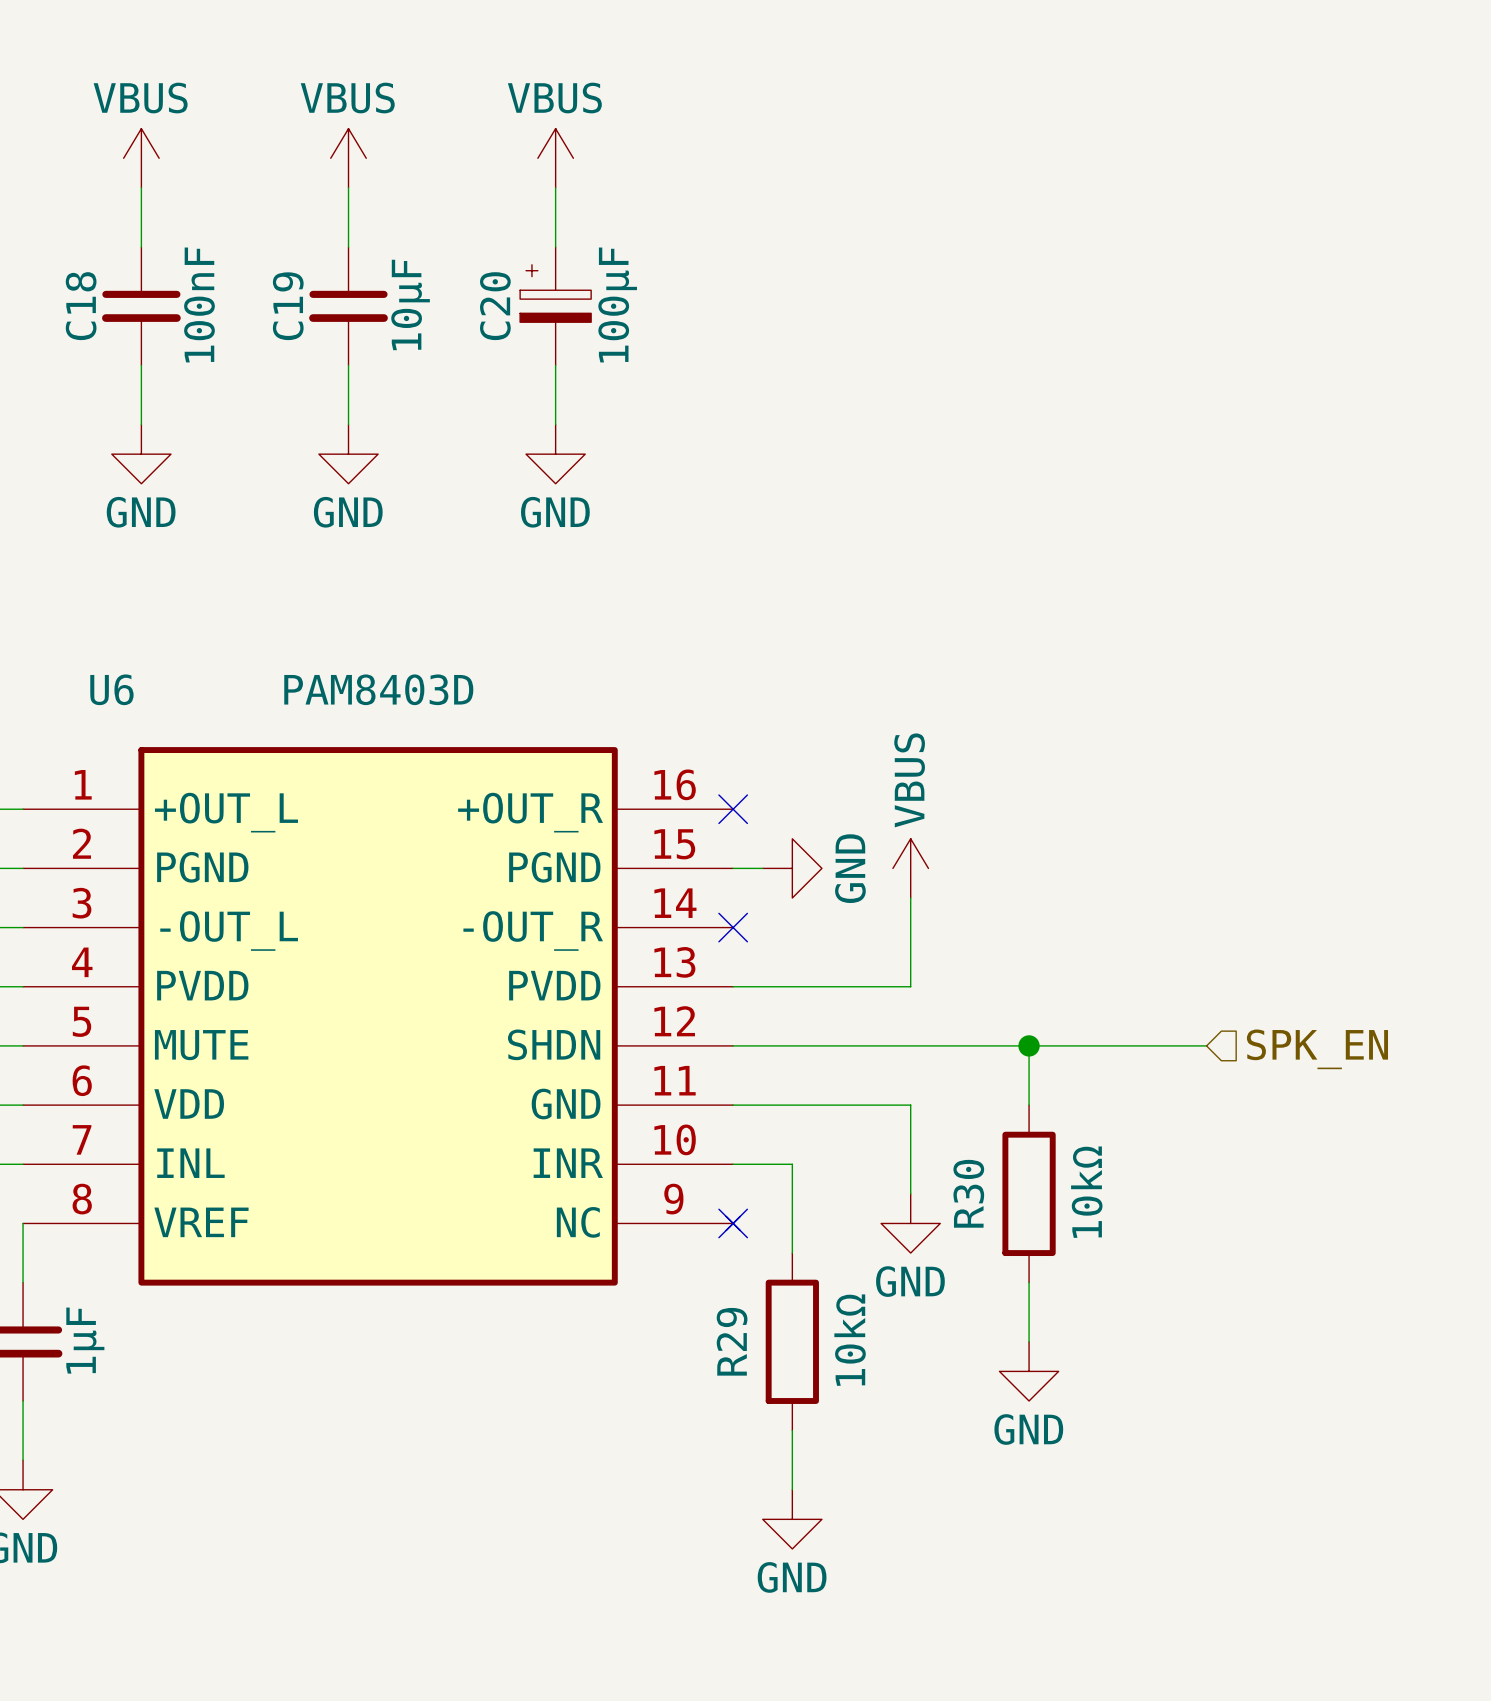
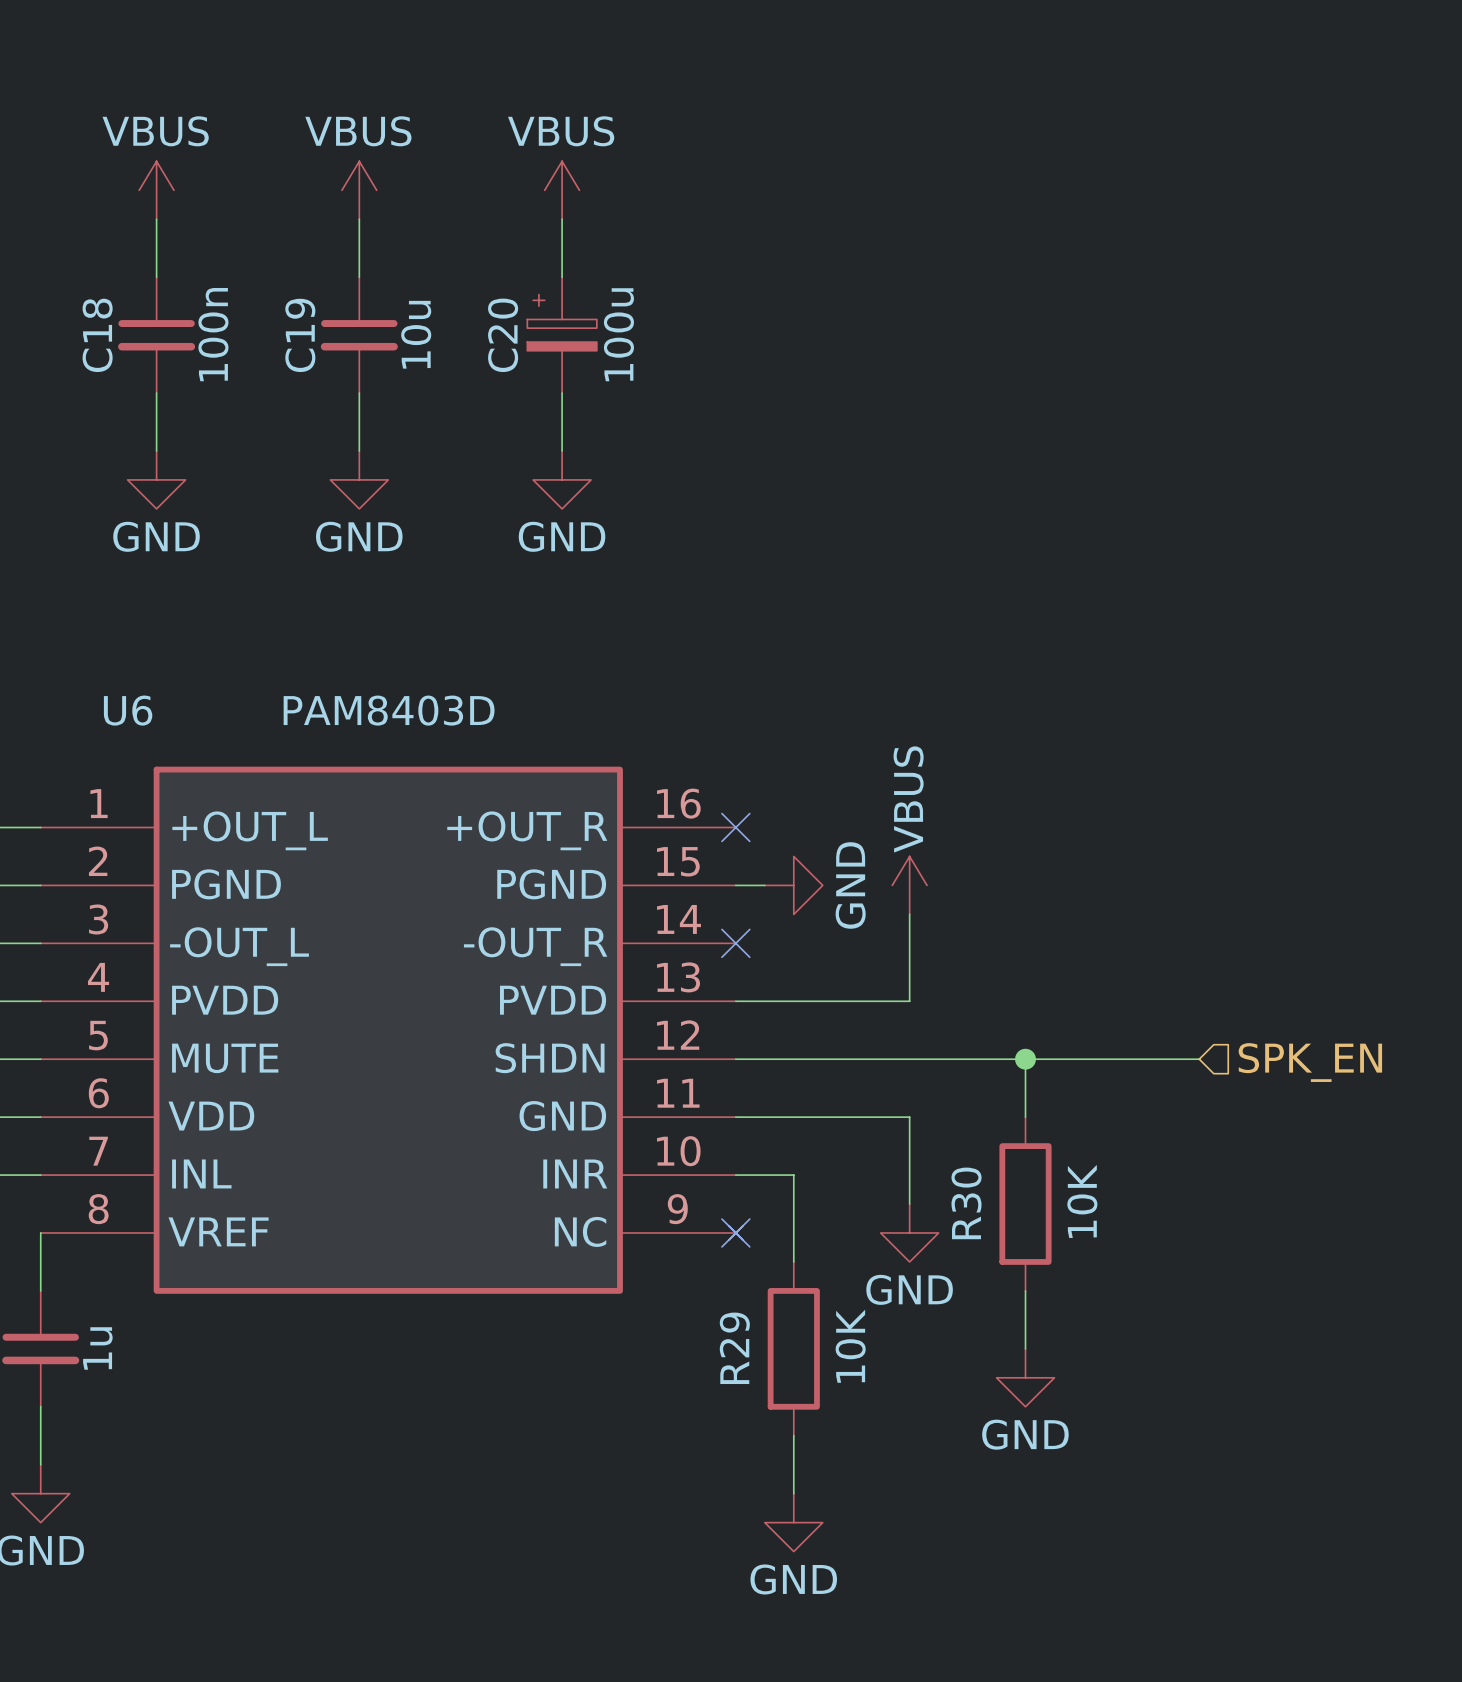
C18 value: 100nF (199, 304) -> 100n (213, 334)
C19 value: 10µF (410, 304) -> 10u (416, 334)
C20 value: 100µF (617, 304) -> 100u (618, 334)
R30 value: 10kΩ (1086, 1192) -> 10K (1082, 1201)
part value: 1µF (85, 1340) -> 1u (97, 1348)
R29 value: 10kΩ (850, 1340) -> 10K (850, 1346)

